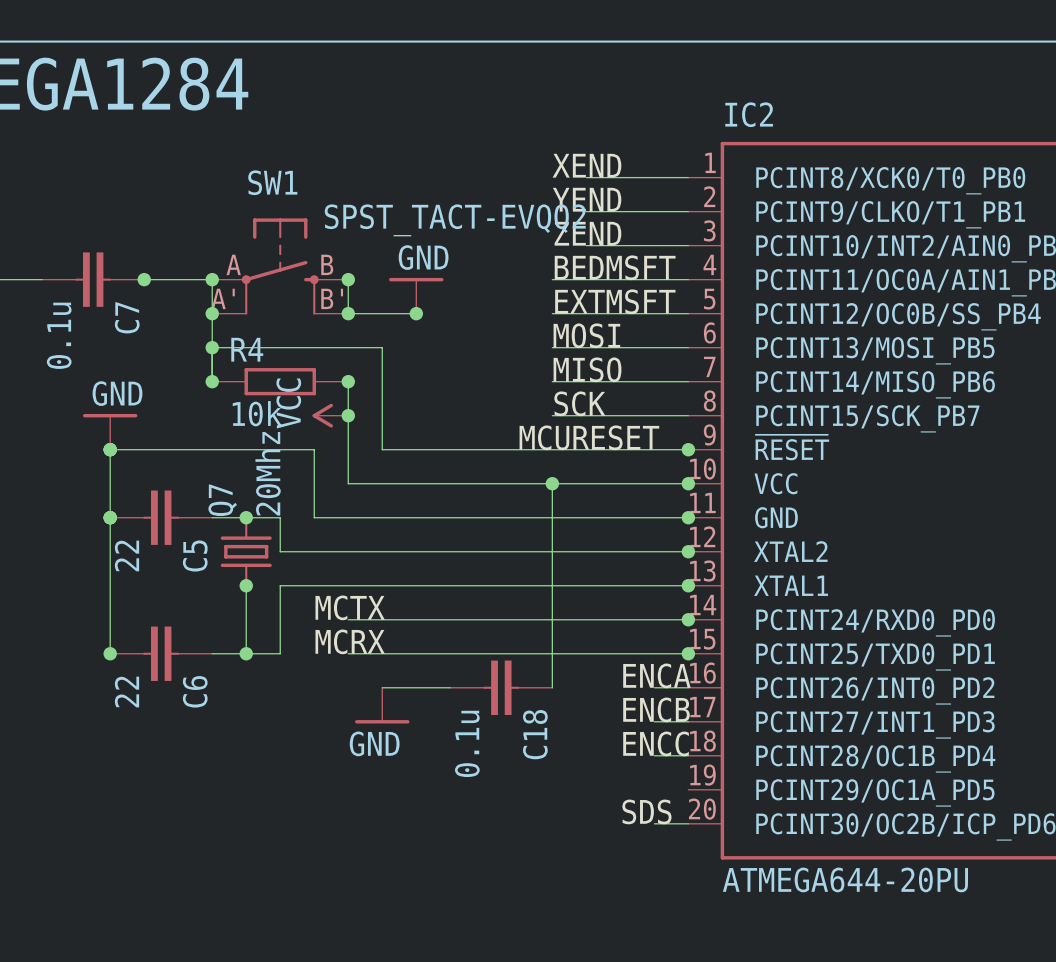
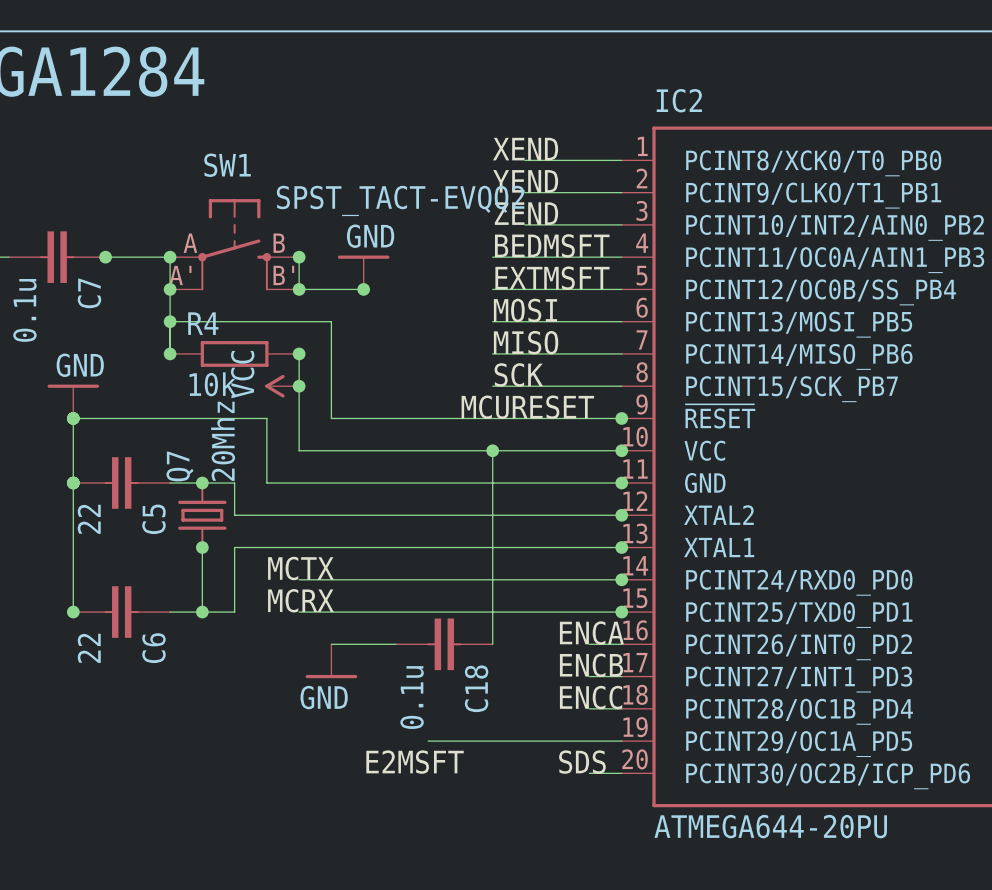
wire: none -> (428, 741) (621, 741)
label: none -> E2MSFT (415, 762)

